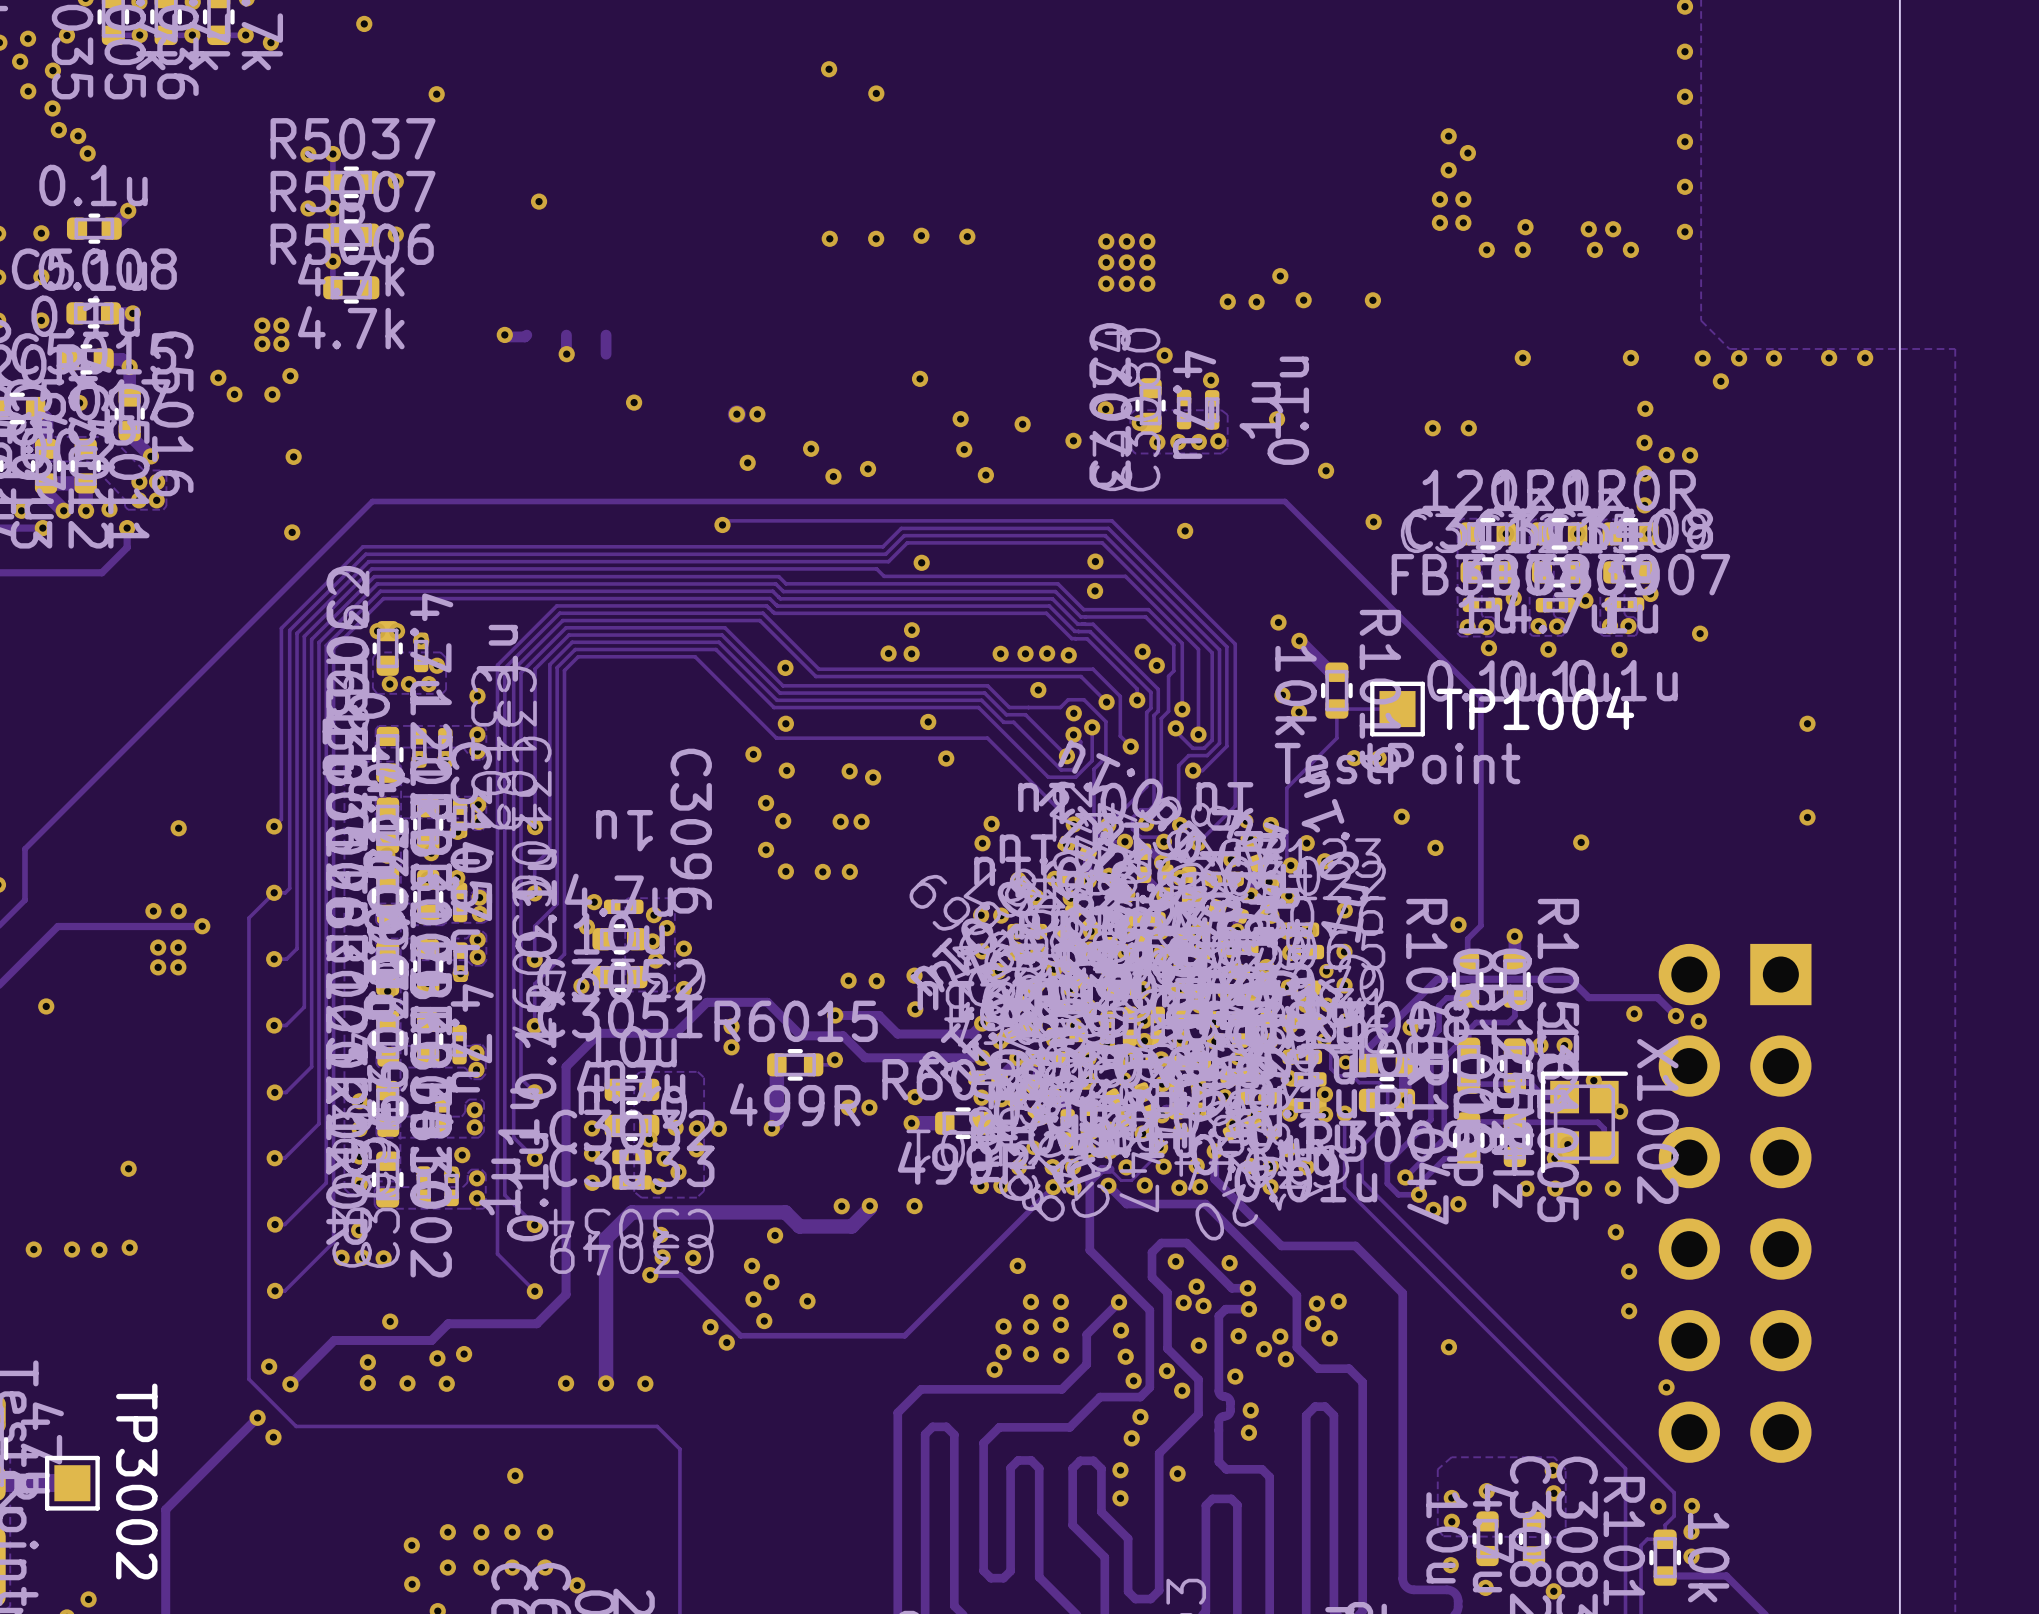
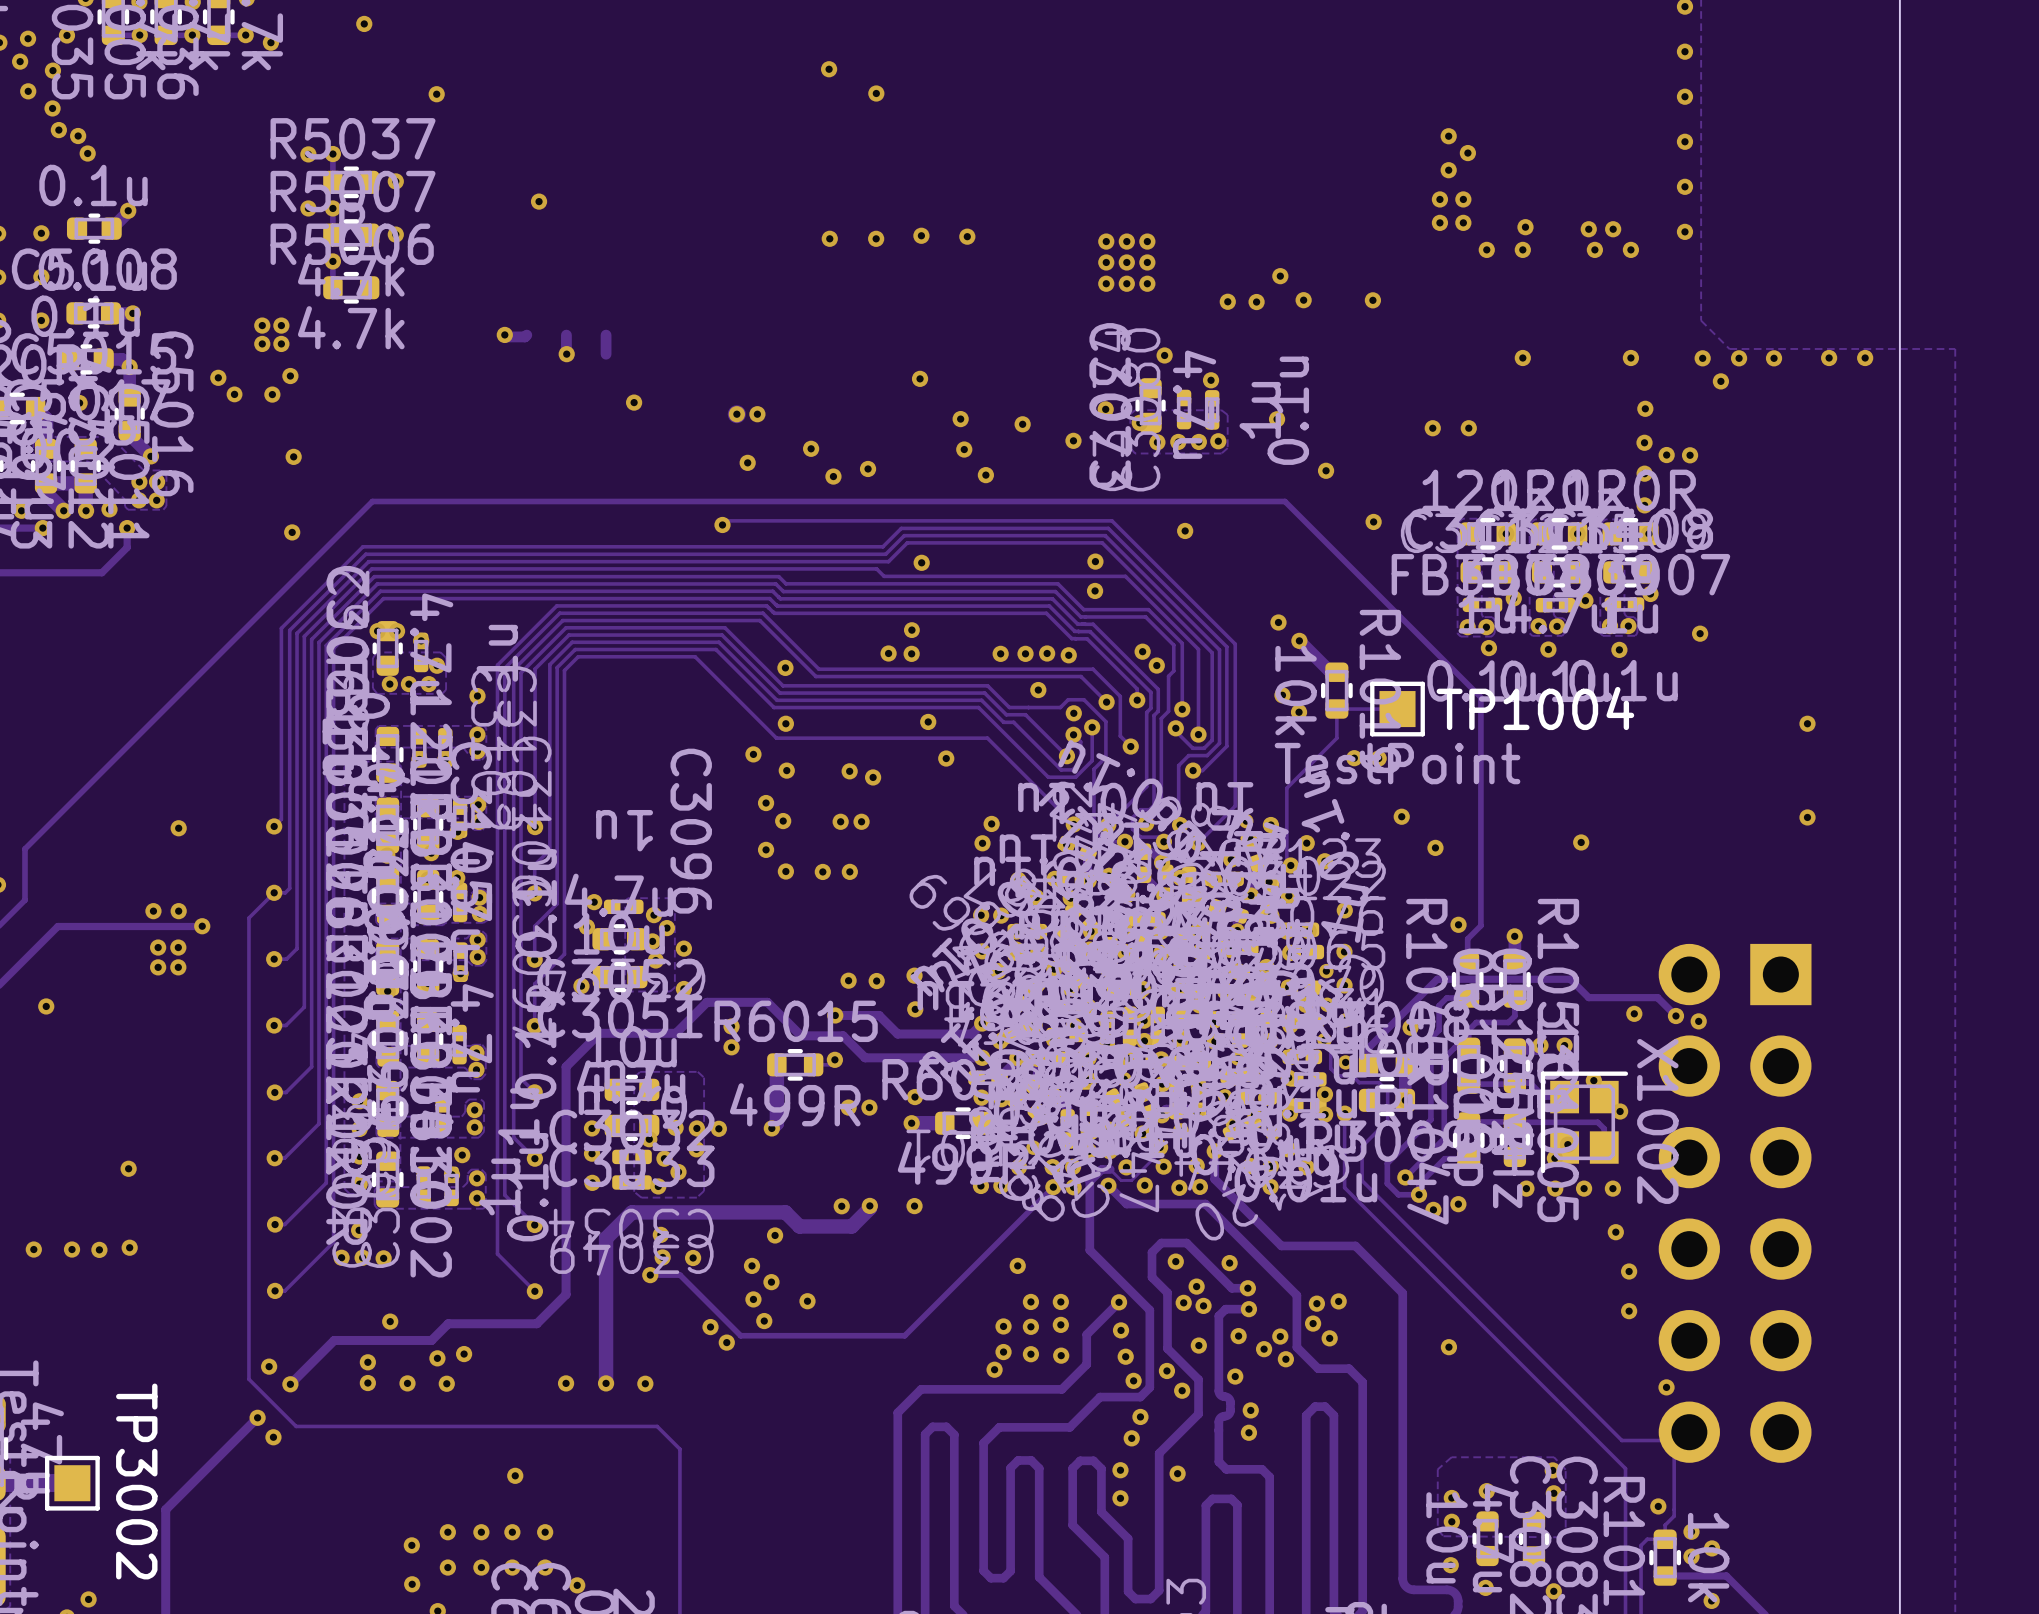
track: (1621, 1440) (1674, 1492) -> (1621, 1440) (1664, 1440) (1674, 1450) (1674, 1492)
via position: (1691, 1505) -> (1712, 1548)
via: none -> (1711, 1600)

